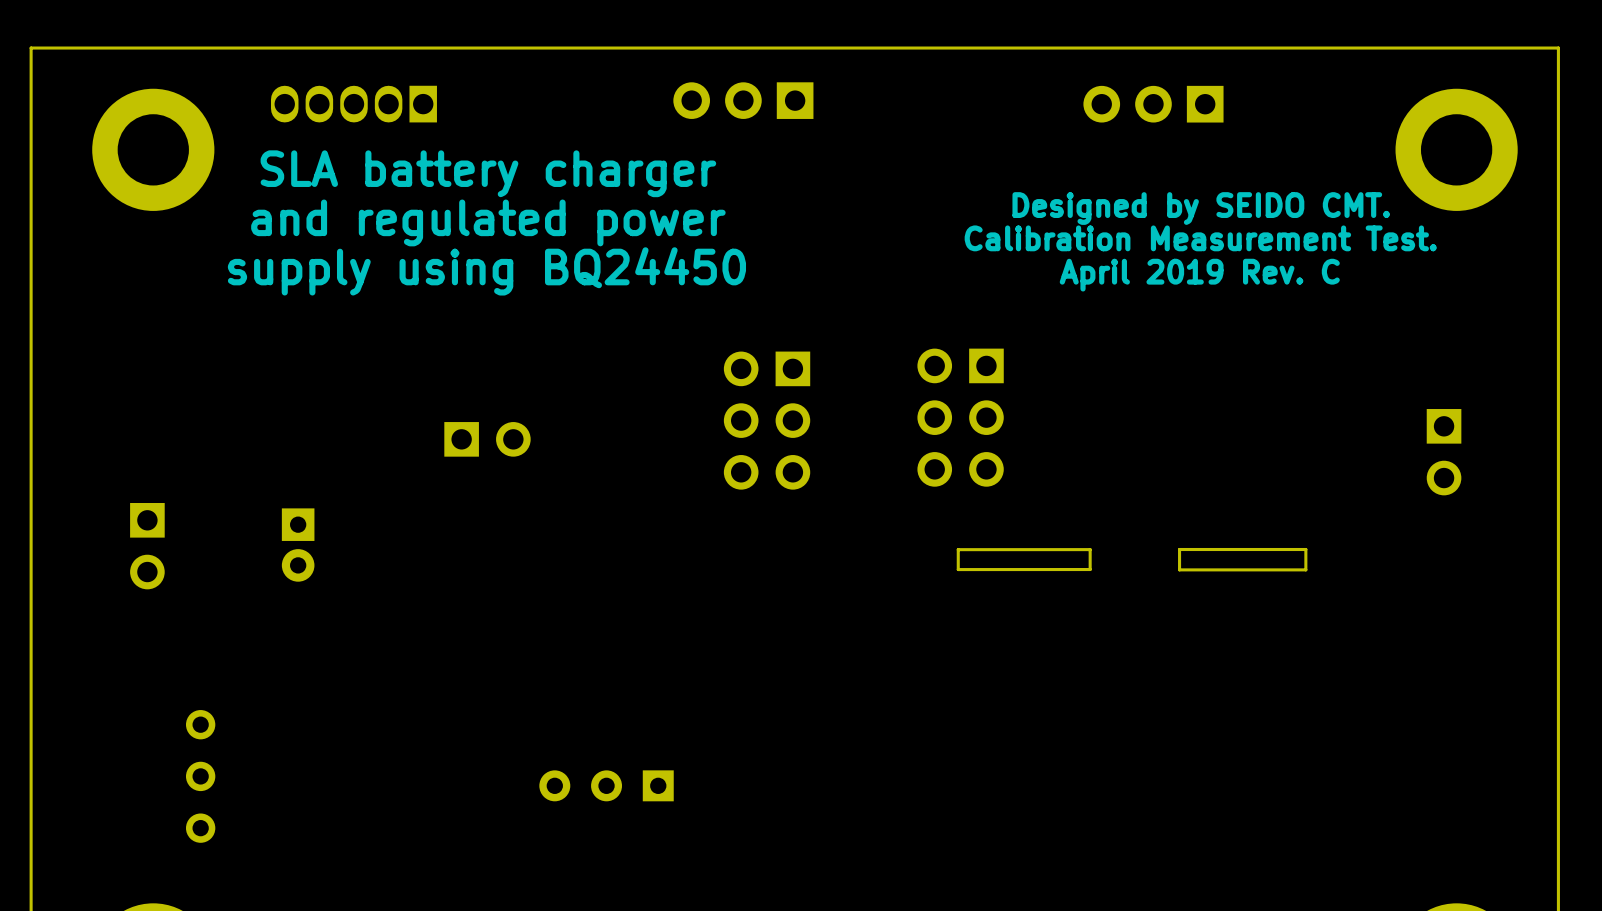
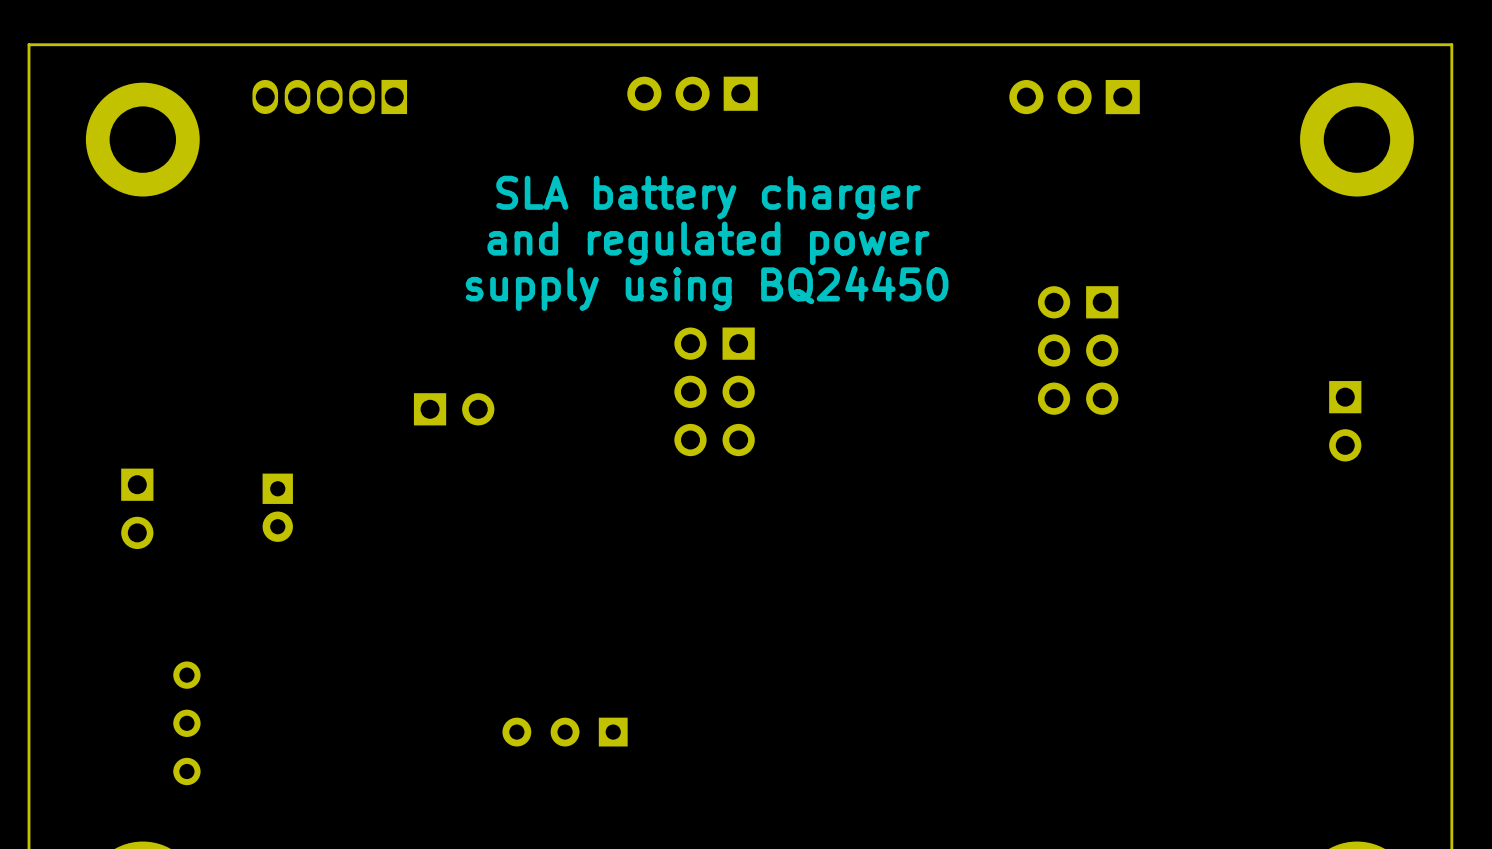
text position: SLA battery charger (488, 173) -> SLA battery charger (708, 197)
text: Designed by SEIDO CMT. (1201, 208) -> none
text position: and regulated power (488, 222) -> and regulated power (708, 243)
text: Calibration Measurement Test. (1200, 238) -> none
text position: supply using BQ24450 (486, 271) -> supply using BQ24450 (707, 288)
text: April 2019 Rev. C (1199, 275) -> none
part position: (960, 417) -> (1078, 350)
board edge: (1090, 549) (958, 549) (958, 569) (1090, 569) (1090, 549) -> none
board edge: (1305, 549) (1305, 569) (1179, 569) (1179, 549) (1305, 549) -> none

